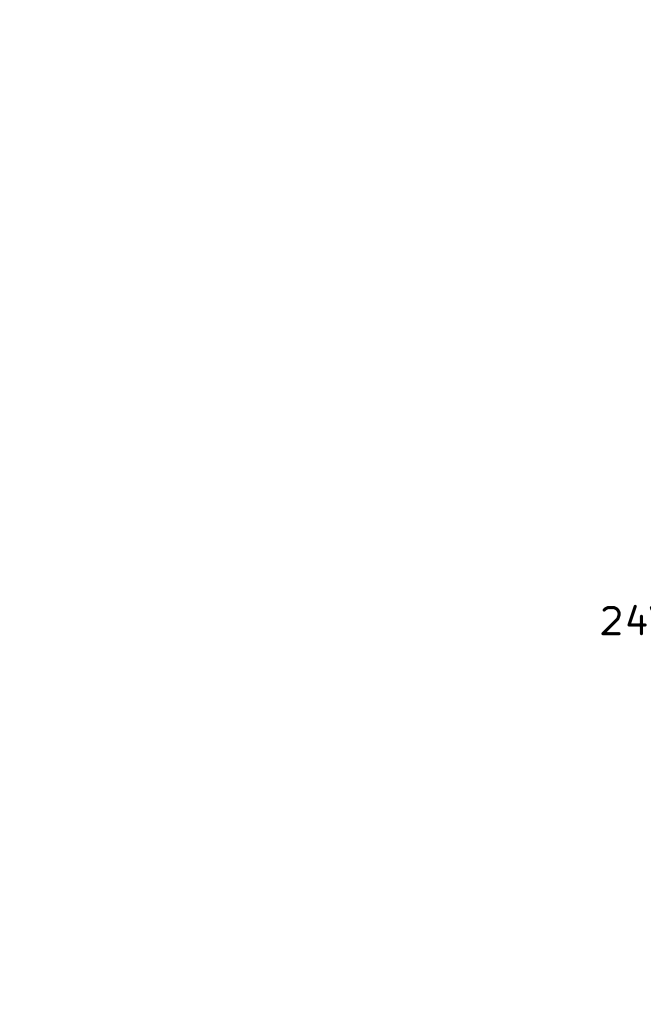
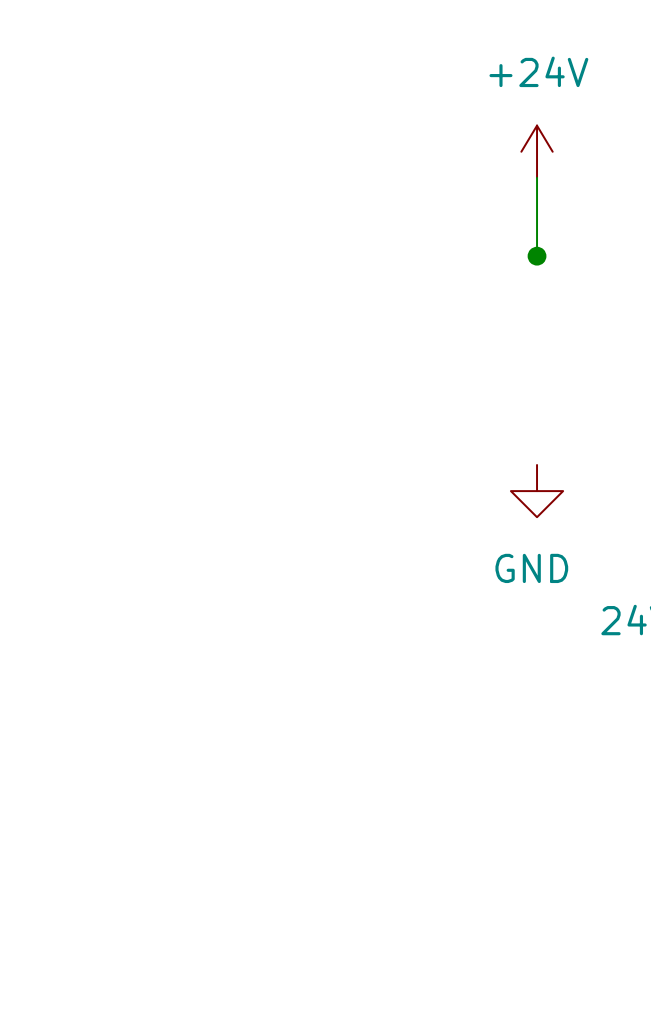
power symbol: none -> +24V (537, 151)
wire: none -> (537, 177) (537, 256)
junction: none -> (537, 256)
power symbol: none -> GND (537, 491)

